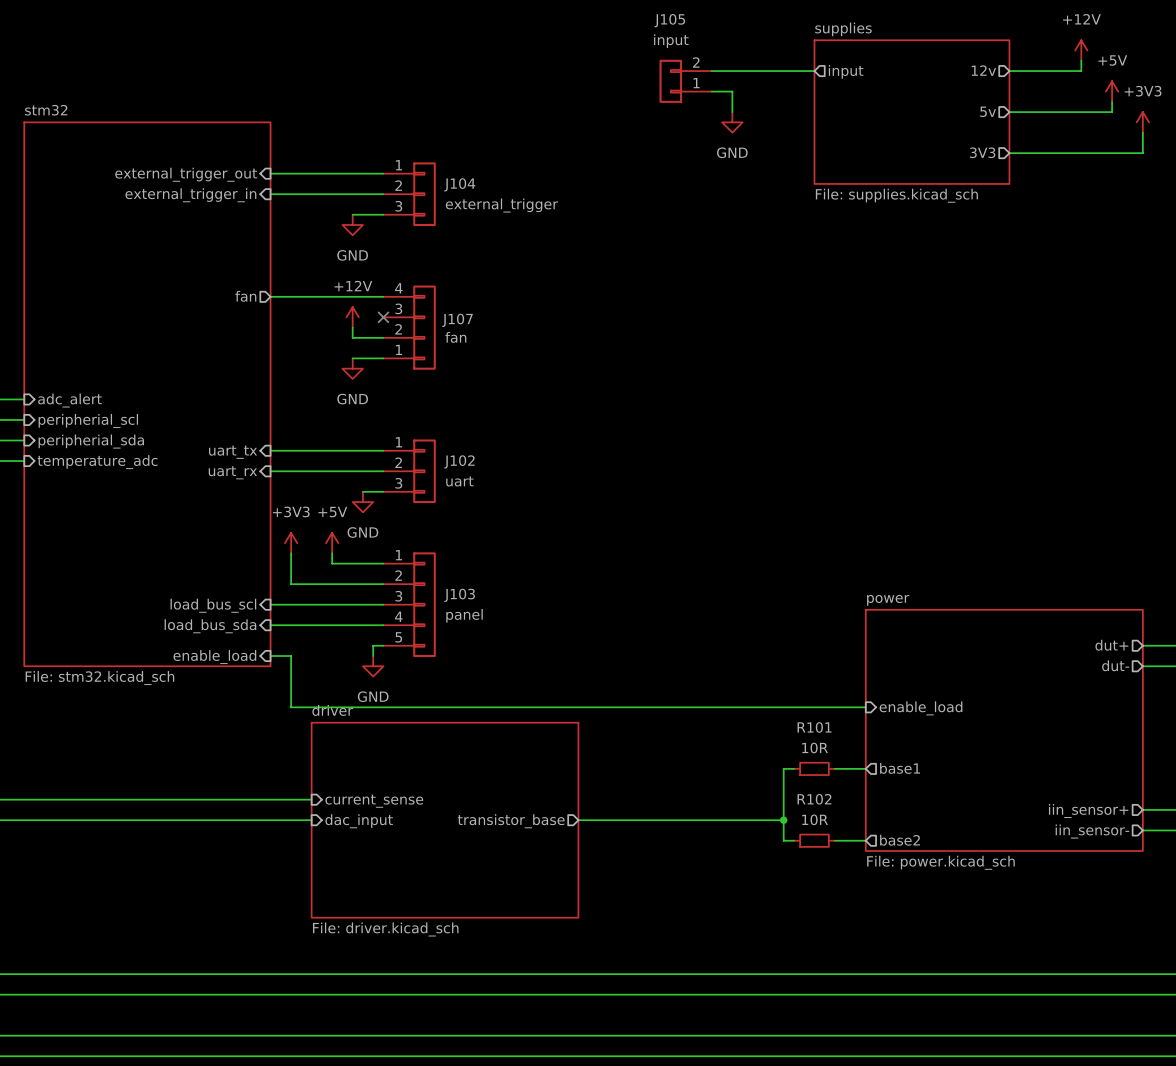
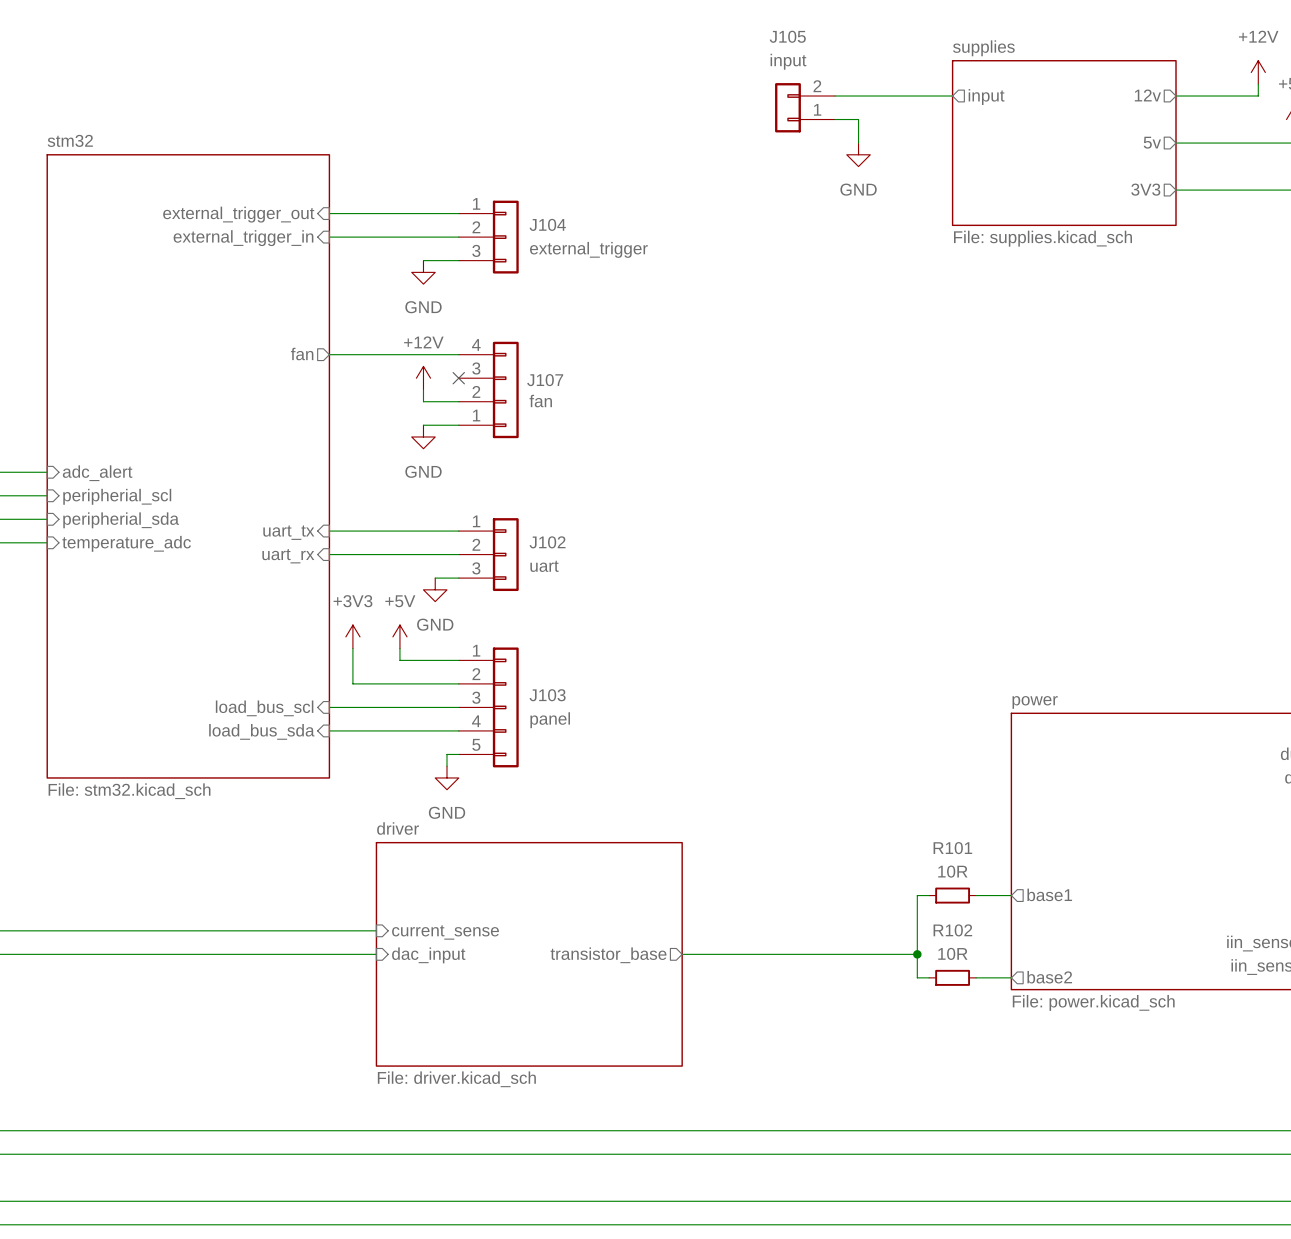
wire: (270, 656) (291, 656) (291, 707) (865, 707) -> none
sheet pin: enable_load (214, 657) -> none
sheet pin: enable_load (920, 708) -> none

